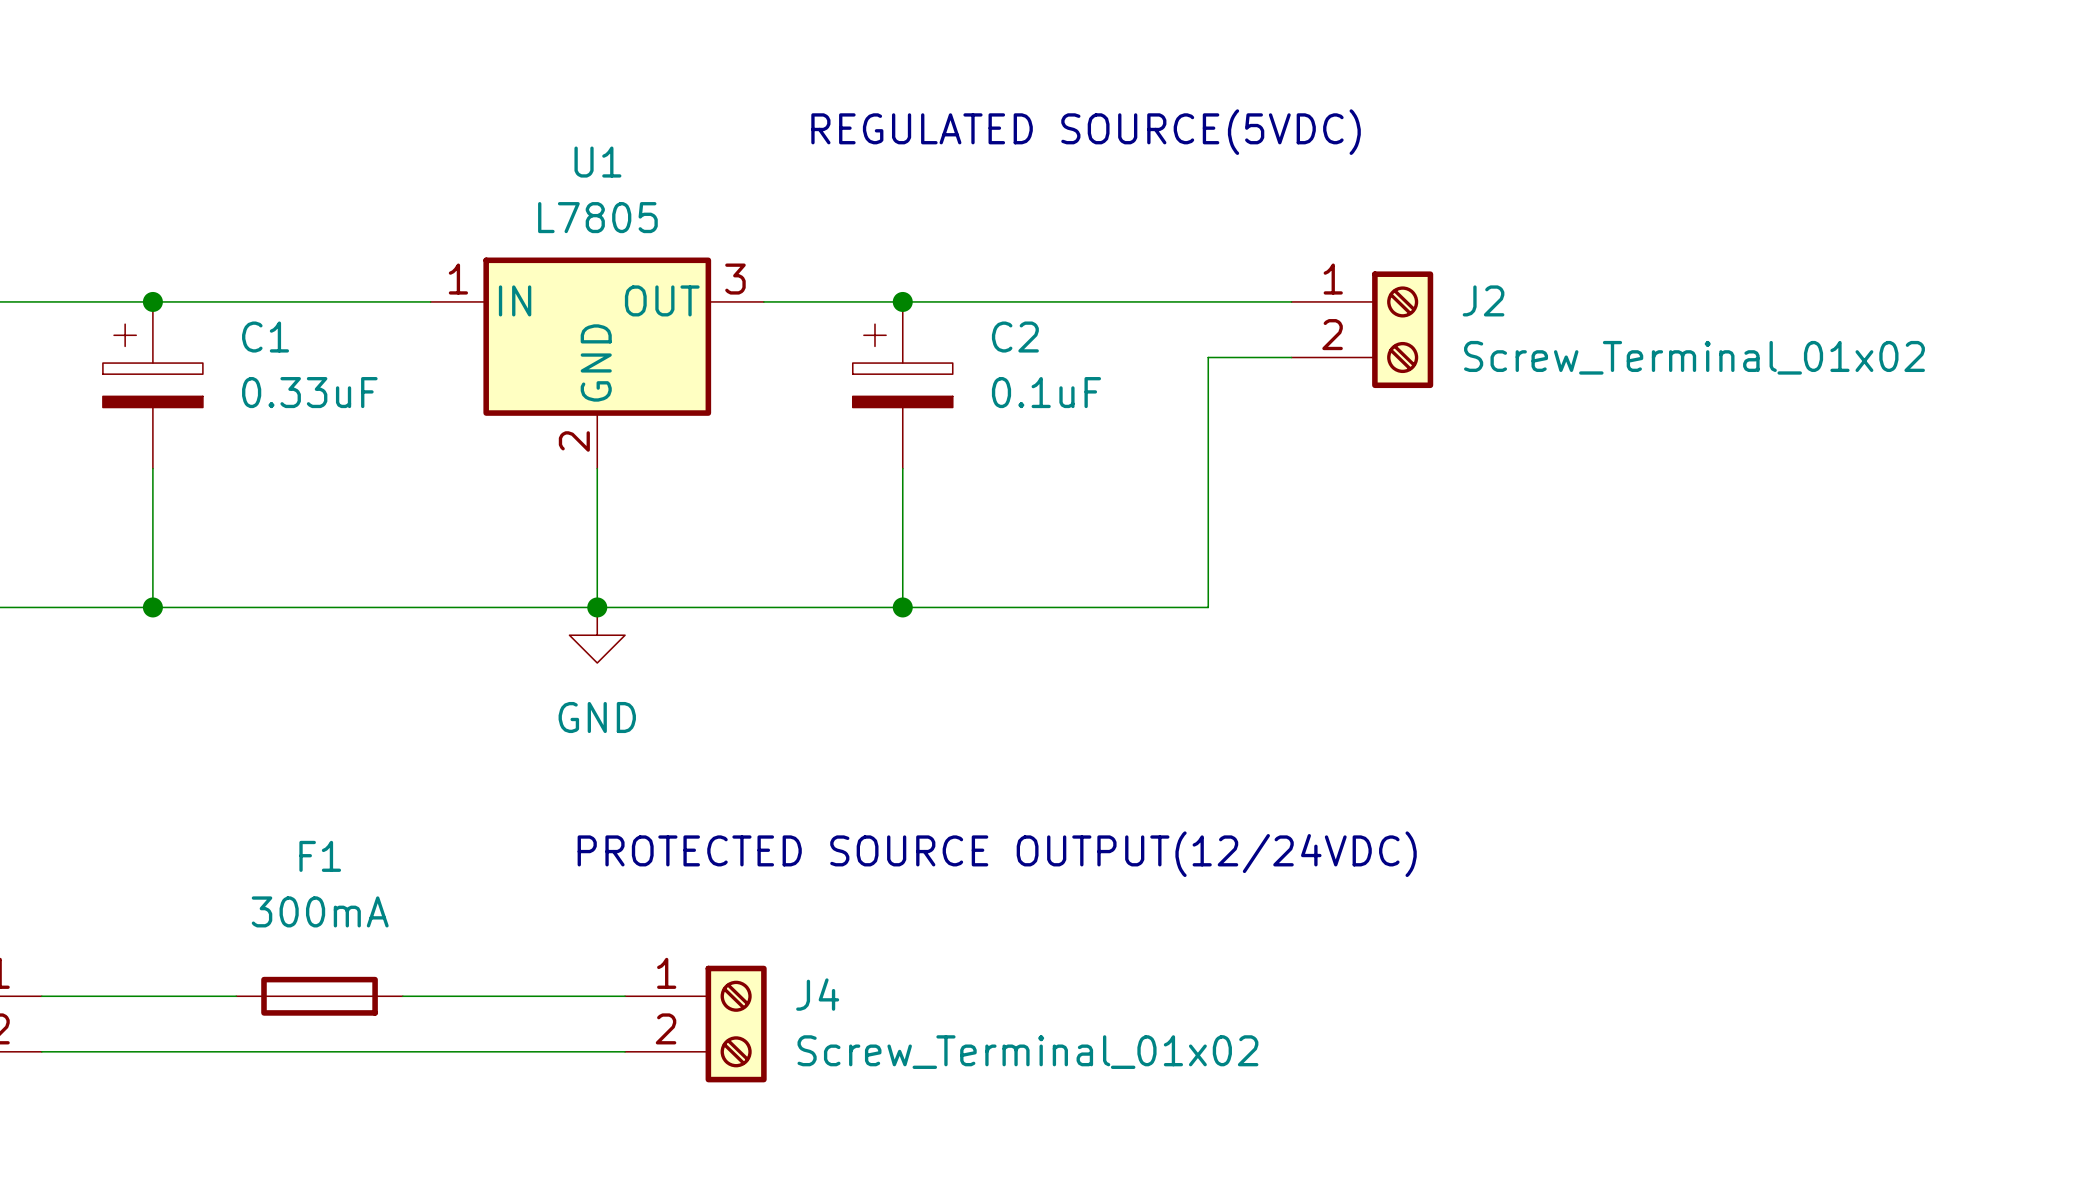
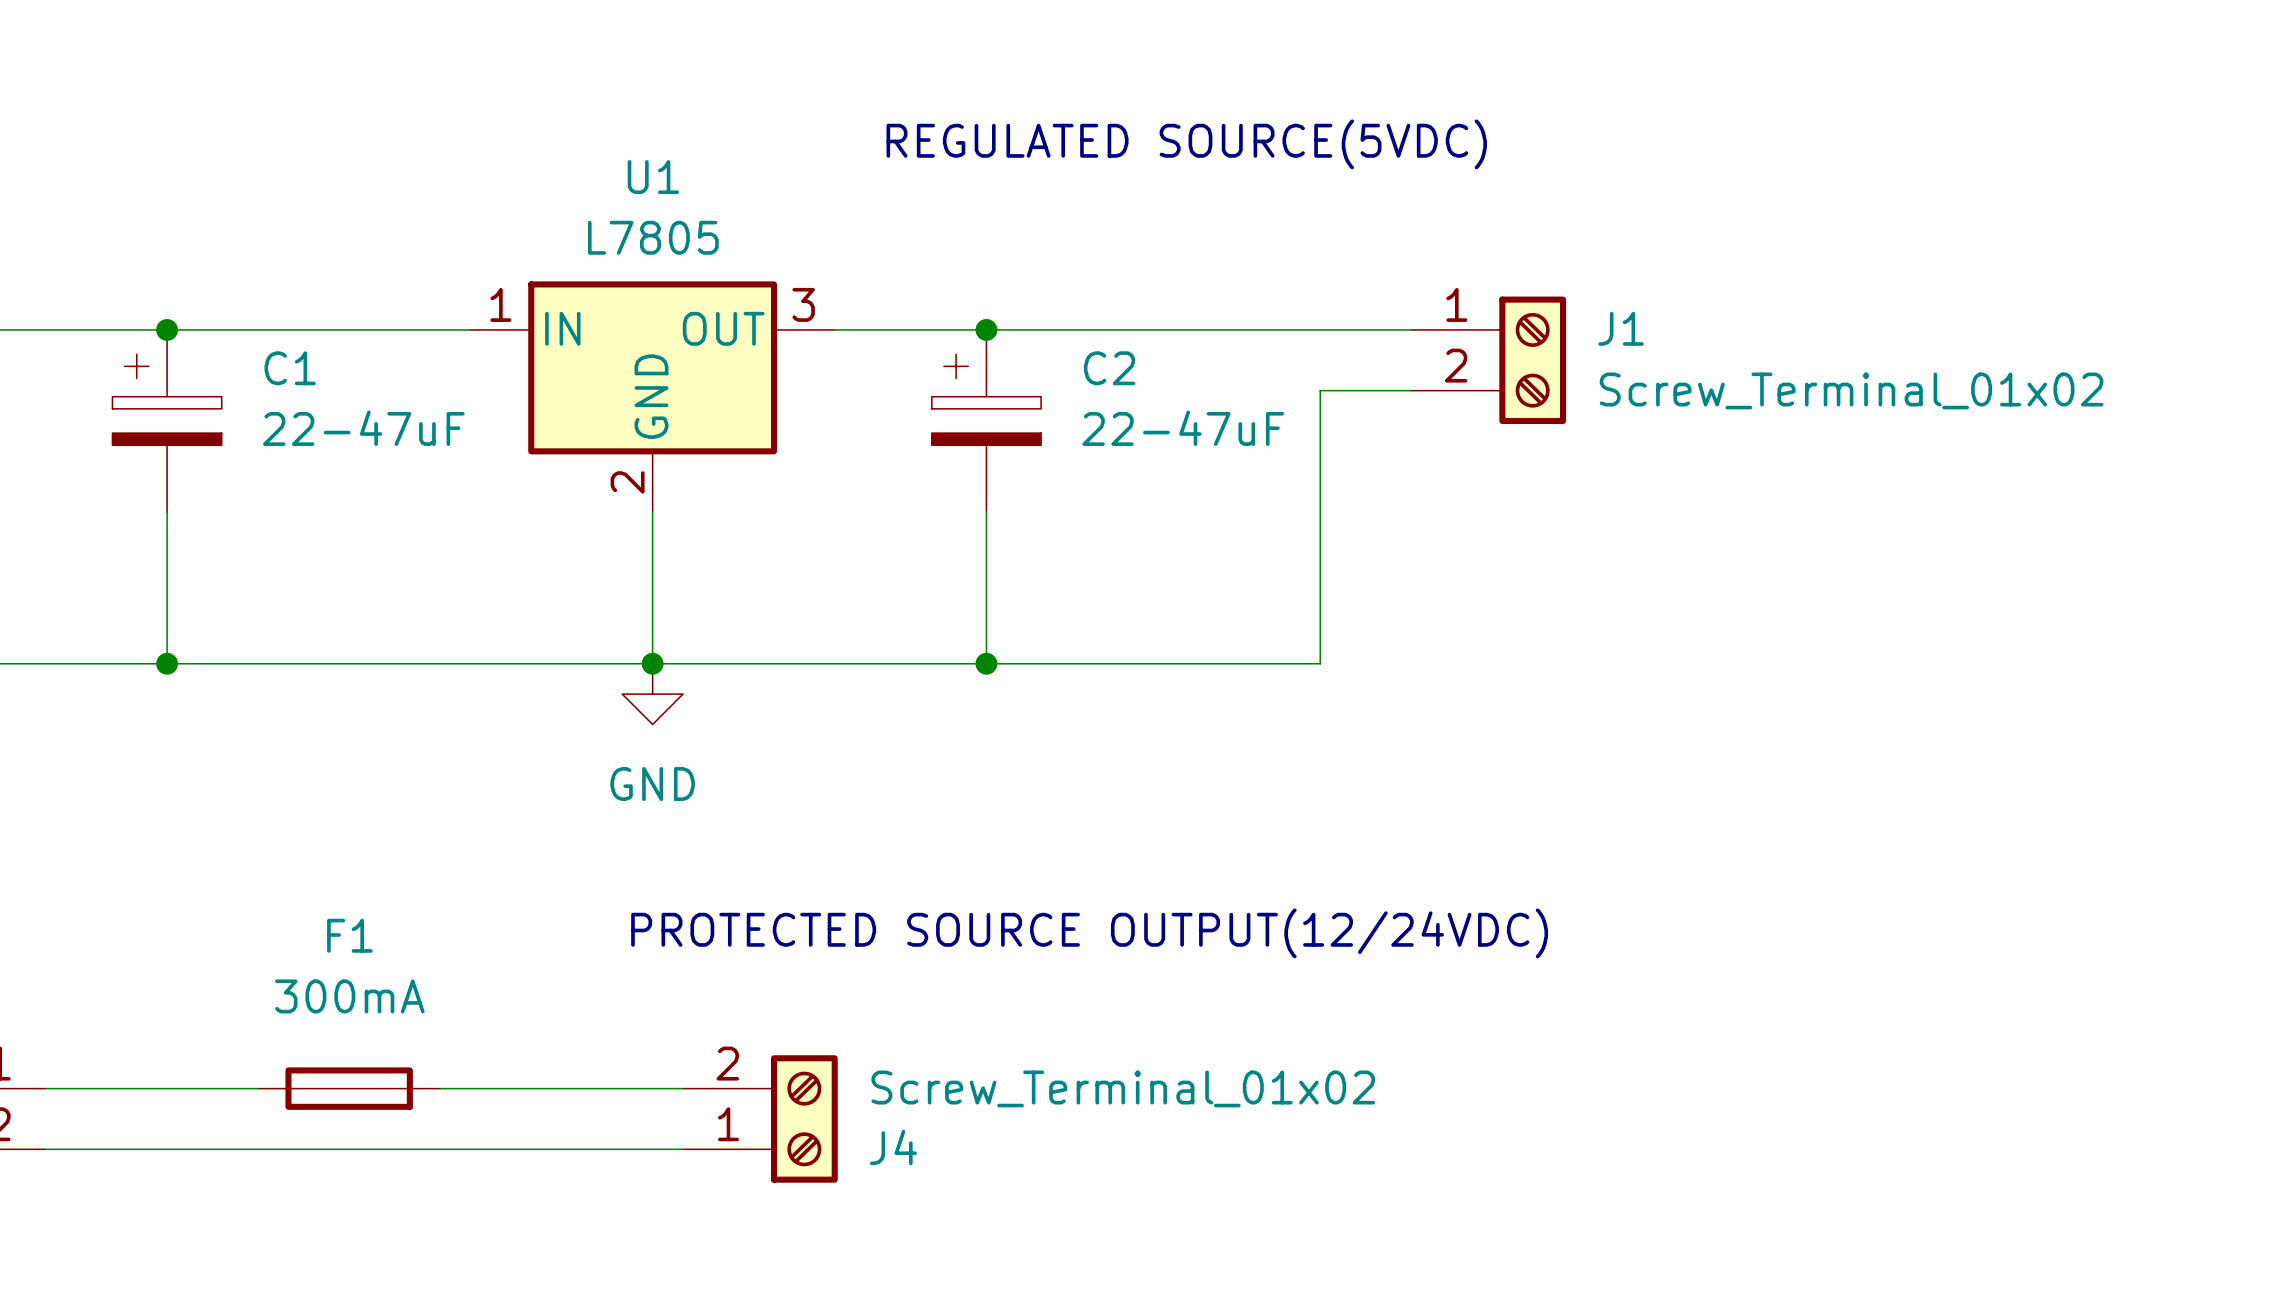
J2 name: J2 (1483, 300) -> J1 (1621, 328)
C1 value: 0.33uF (309, 392) -> 22-47uF (363, 428)
C2 value: 0.1uF (1046, 392) -> 22-47uF (1183, 428)
J4 flip: as is (736, 1024) -> up-down (804, 1118)

